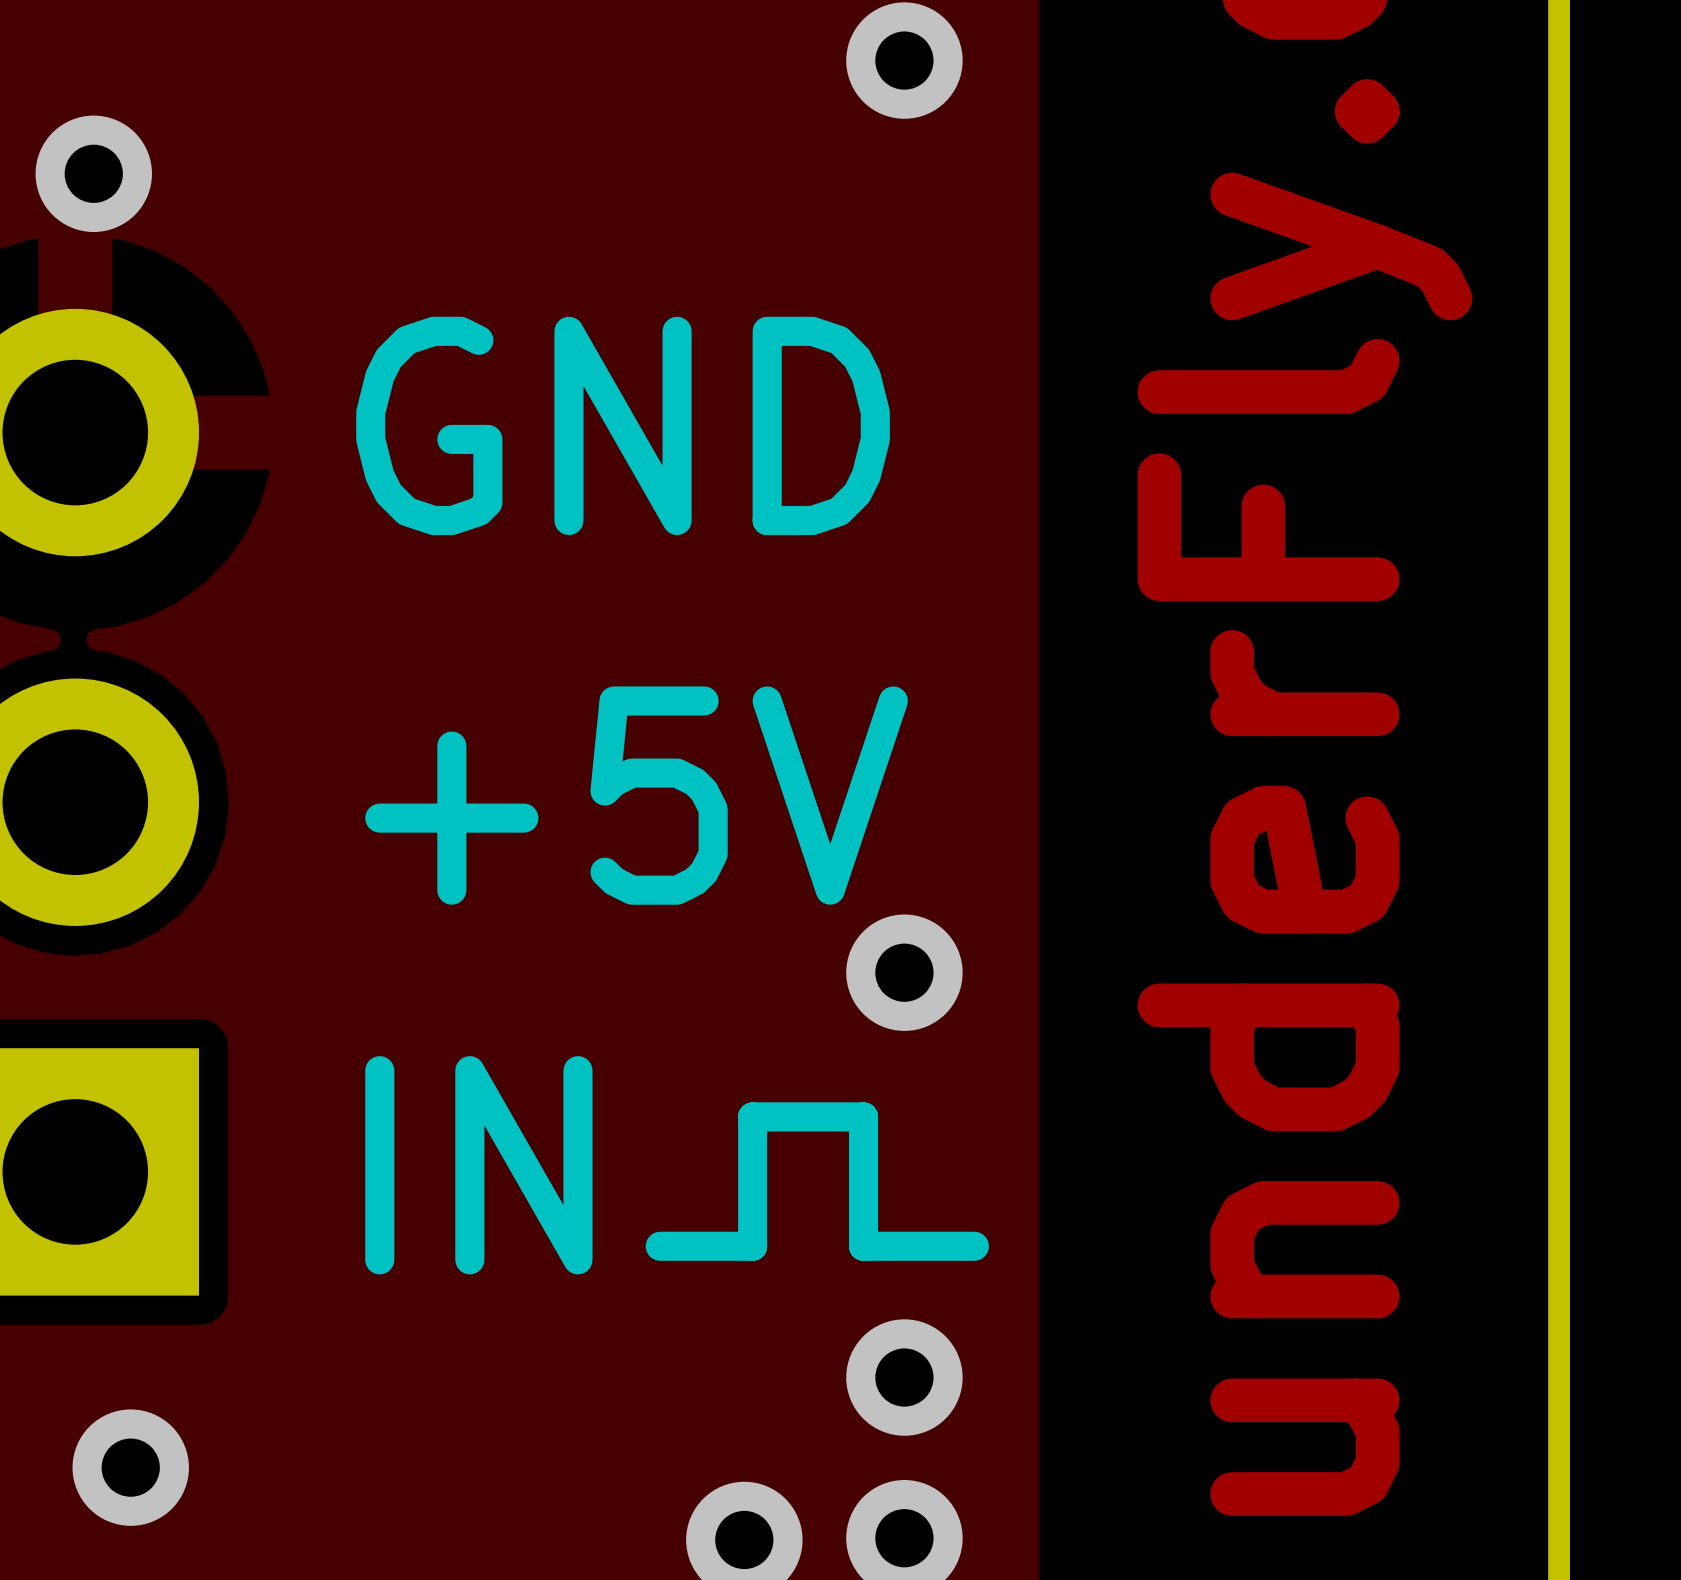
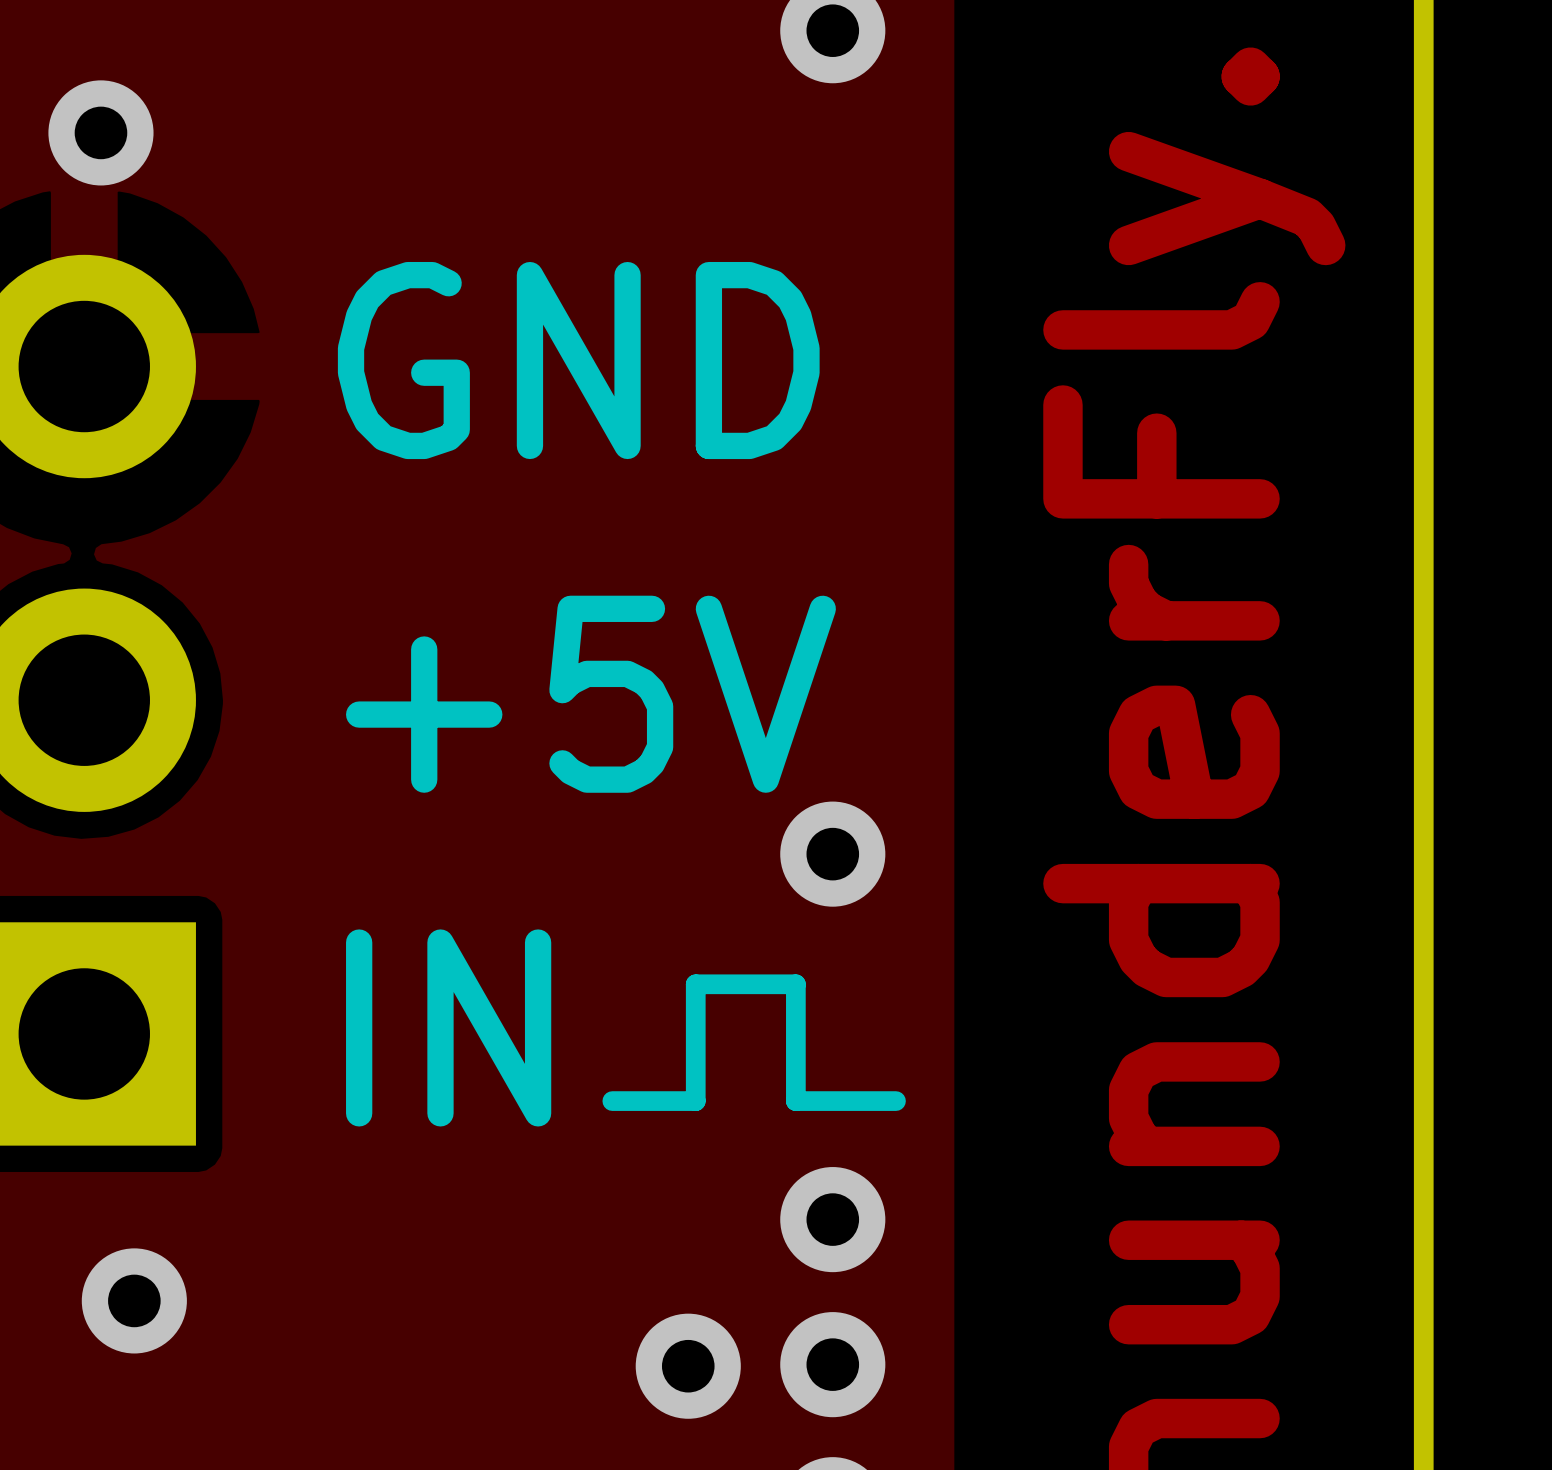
line width: thick (660, 1246) (752, 1246) (752, 1116) (863, 1116) (863, 1246) (974, 1246) -> thin (612, 1101) (695, 1101) (695, 984) (795, 984) (795, 1101) (895, 1101)

